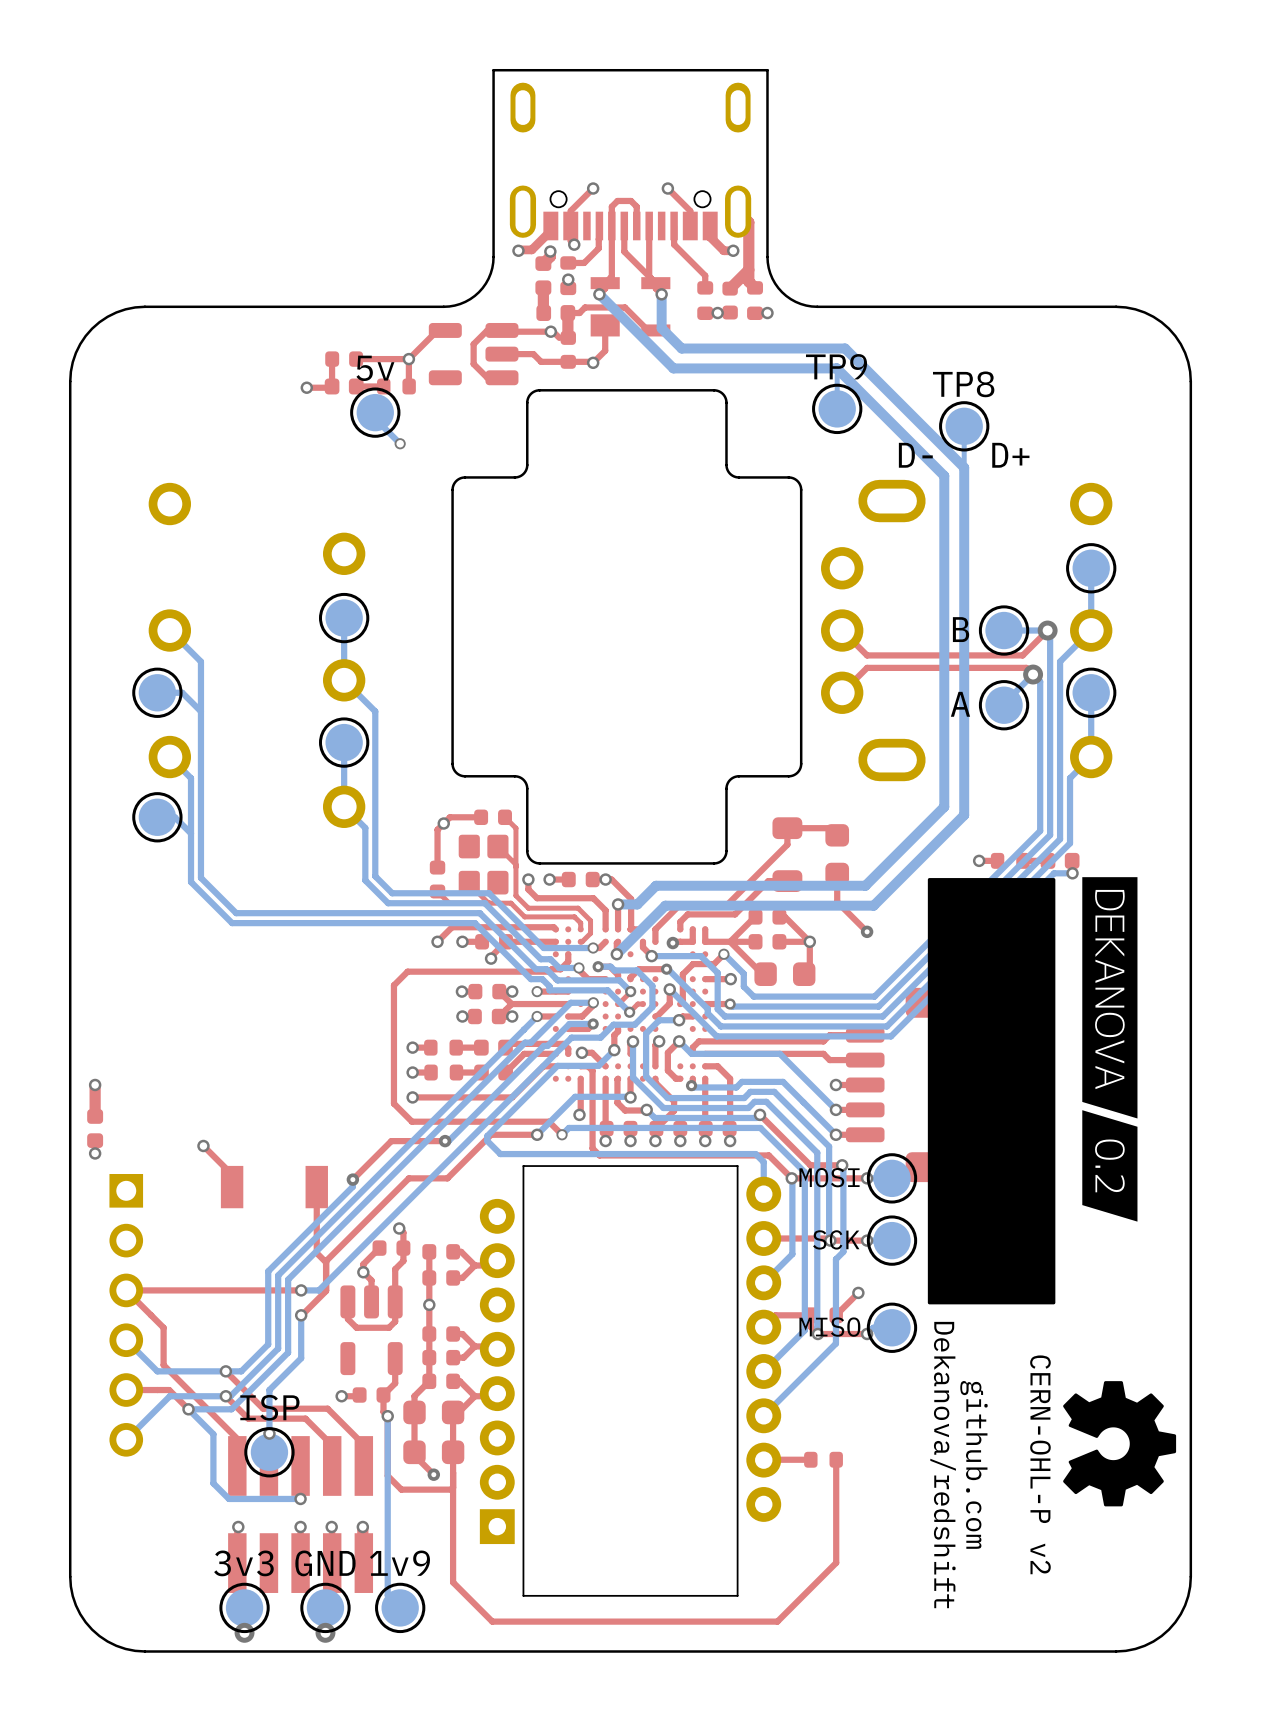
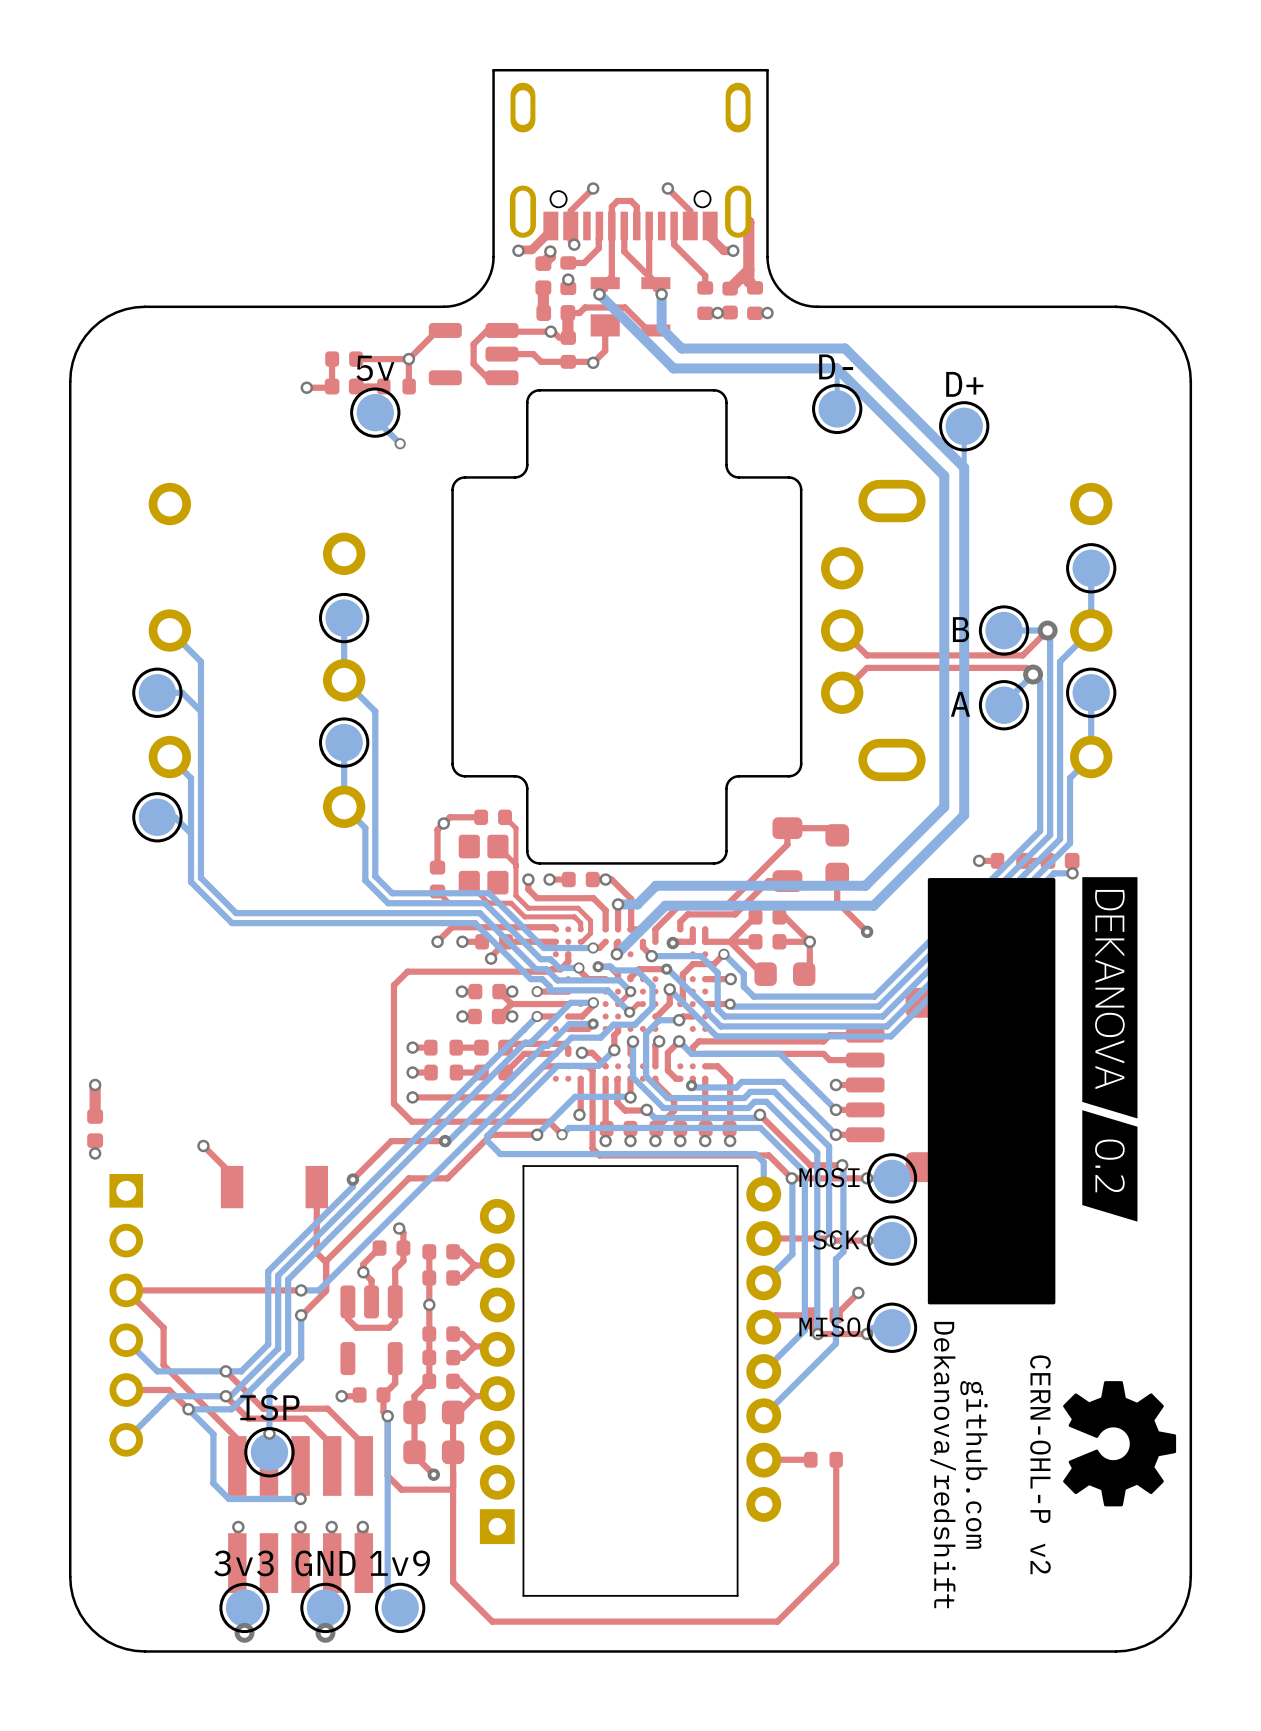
TP9 name: TP9 (836, 366) -> D- (836, 366)
TP8 name: TP8 (963, 384) -> D+ (964, 384)
text: D- (915, 455) -> none
text: D+ (1010, 455) -> none

